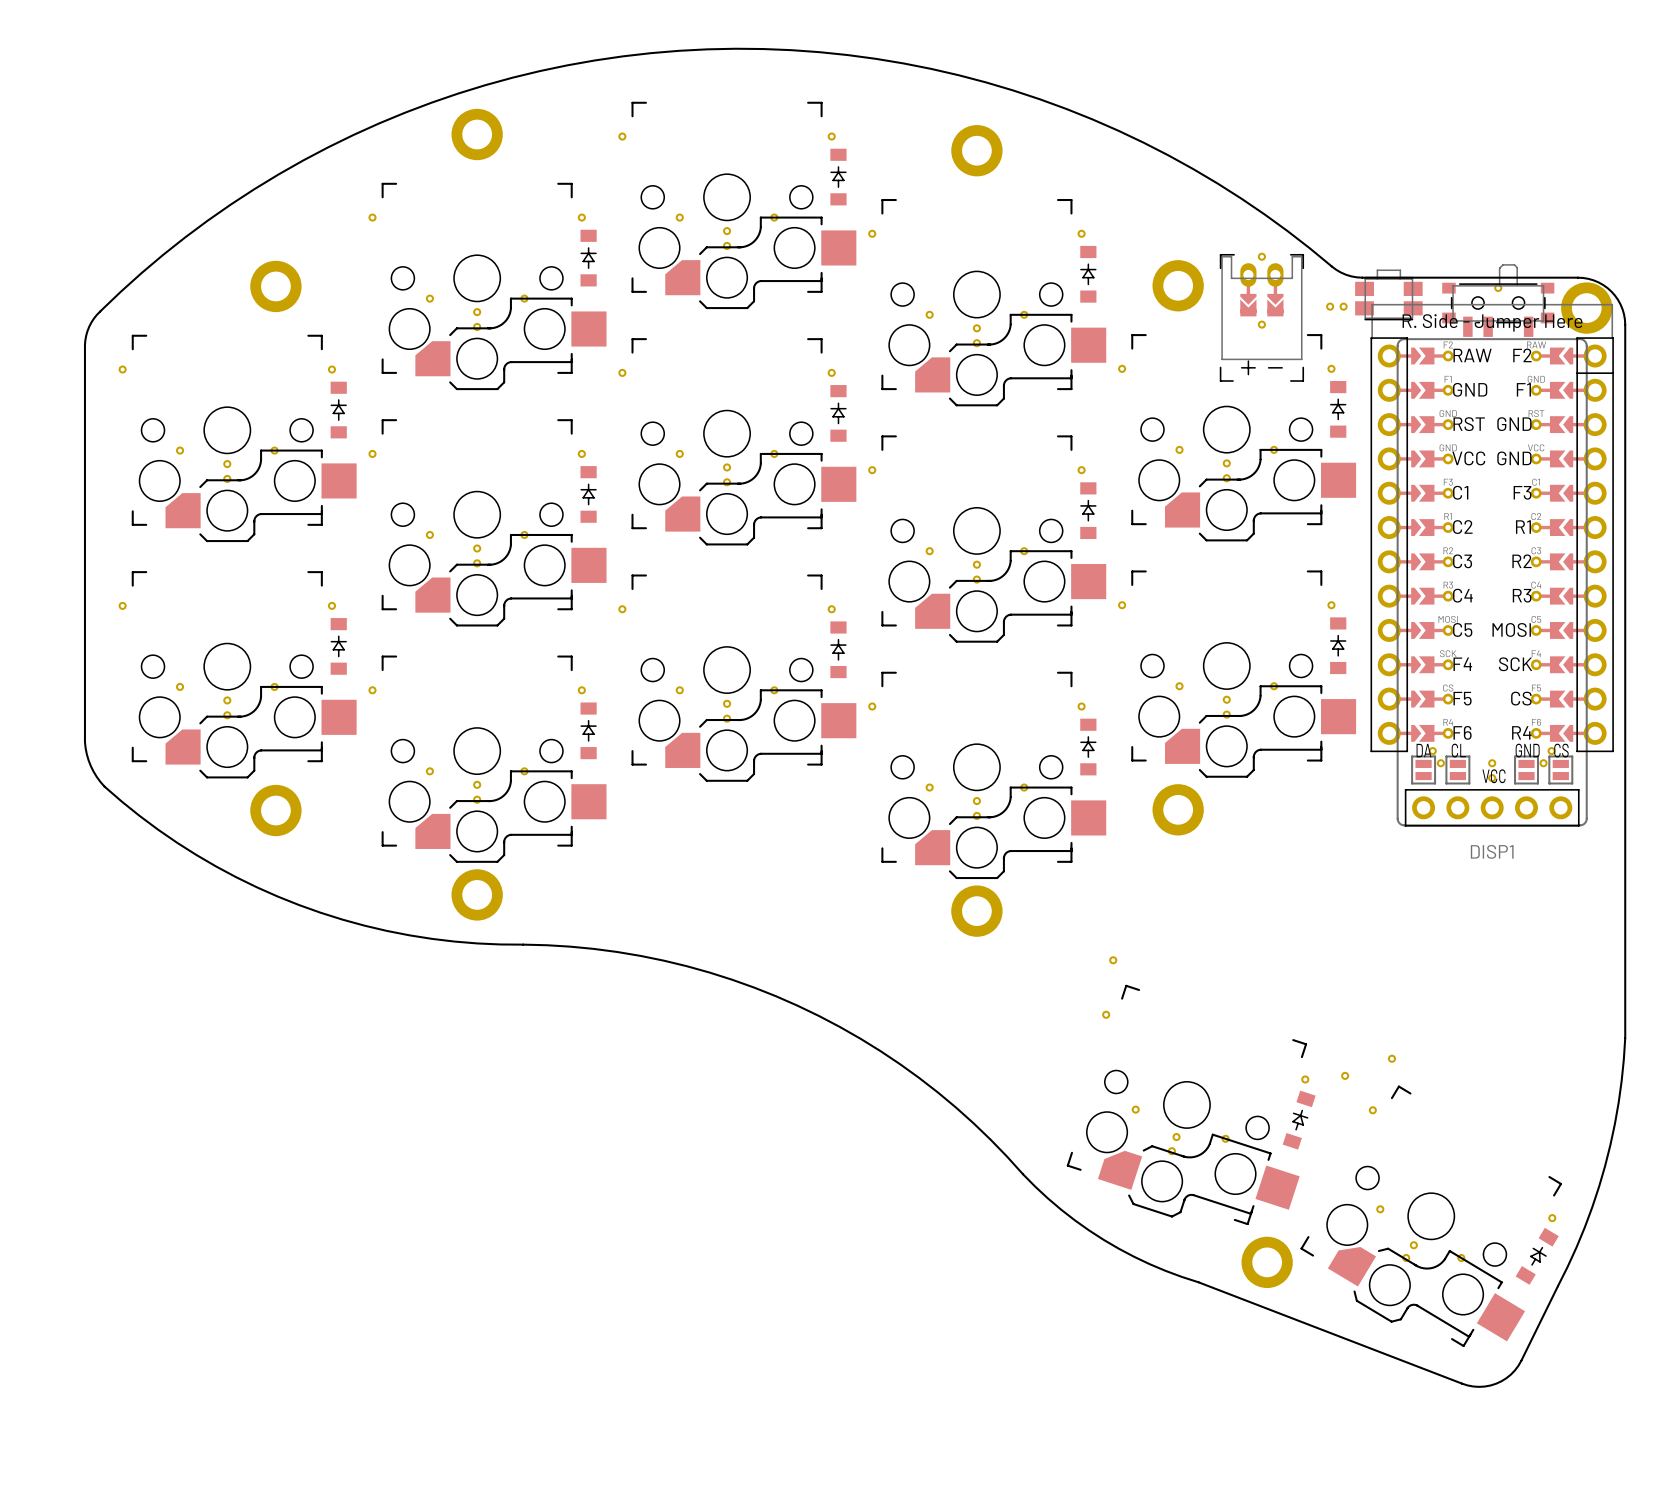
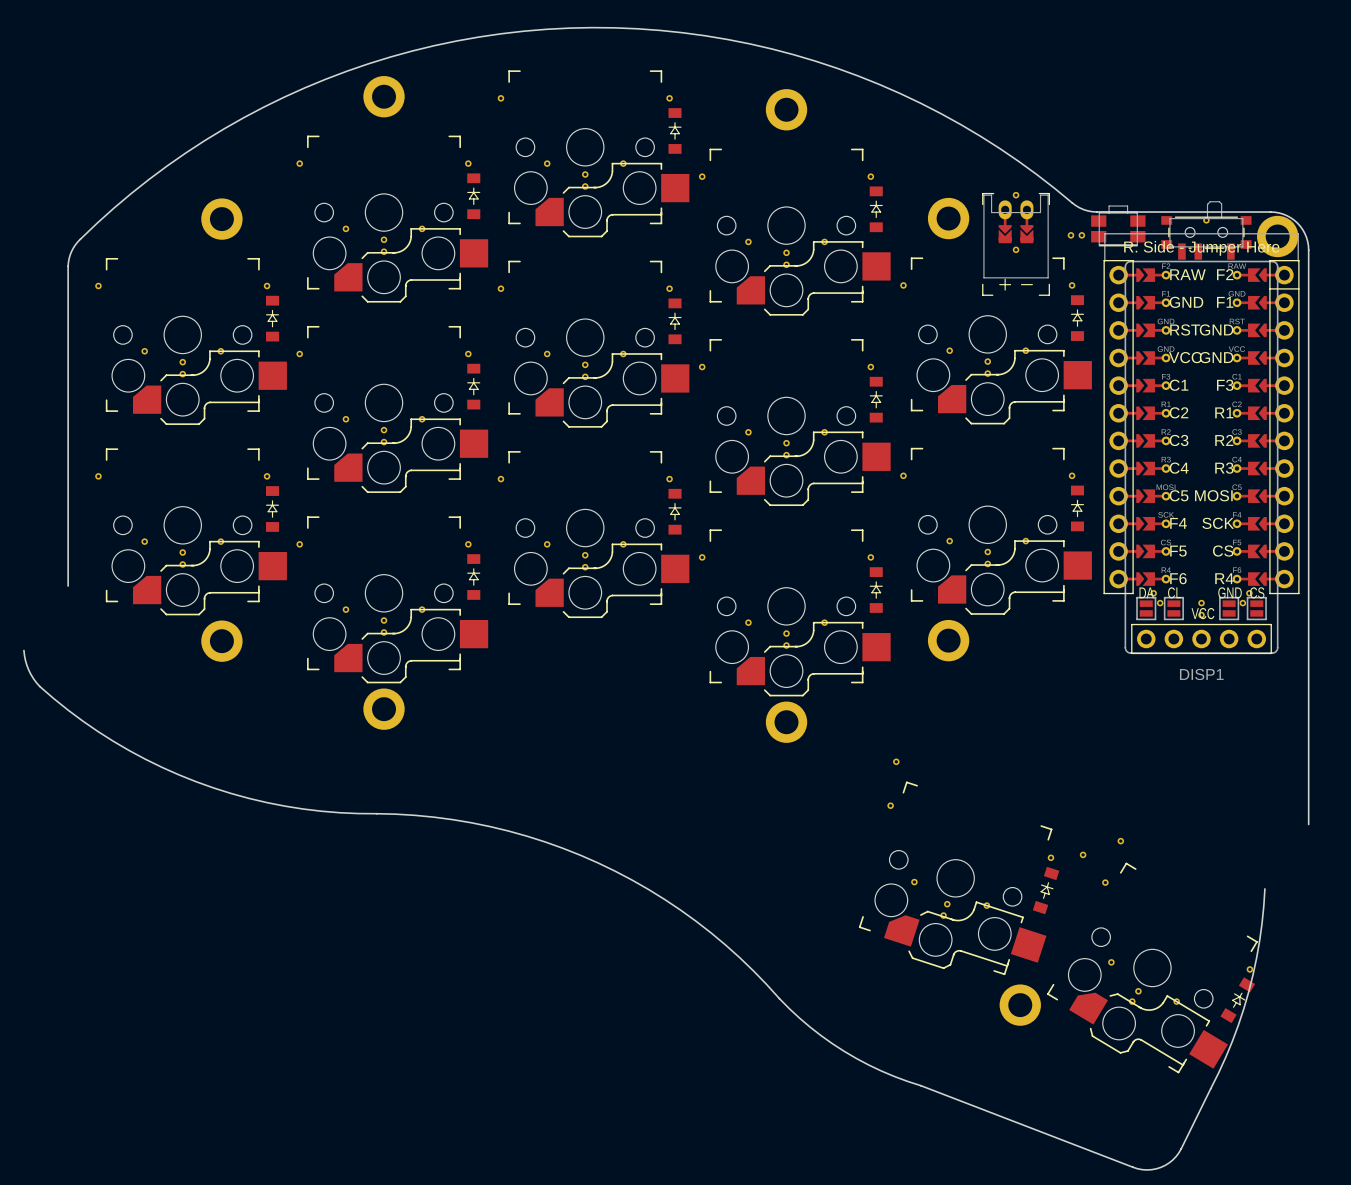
board edge: (84, 742) (90, 766) (100, 781) (139, 815) (176, 842) (216, 866) (256, 887) (299, 905) (364, 925) (431, 938) (477, 943) (570, 946) (640, 955) (686, 966) (731, 979) (797, 1005) (860, 1038) (919, 1078) (973, 1123) (1047, 1198) (1074, 1220) (1118, 1248) (1165, 1270) (1467, 1385) (1484, 1386) (1496, 1383) (1515, 1370) (1576, 1247) (1592, 1207) (1610, 1144) (1621, 1081) (1625, 1038) -> (23, 650) (28, 669) (36, 682) (68, 710) (129, 750) (196, 781) (249, 798) (303, 809) (340, 812) (414, 815) (471, 822) (526, 836) (598, 862) (648, 889) (695, 921) (739, 957) (799, 1018) (821, 1035) (856, 1058) (894, 1076) (1142, 1169) (1156, 1168) (1165, 1165) (1178, 1152) (1225, 1057) (1238, 1025) (1252, 975) (1259, 940) (1264, 888)

